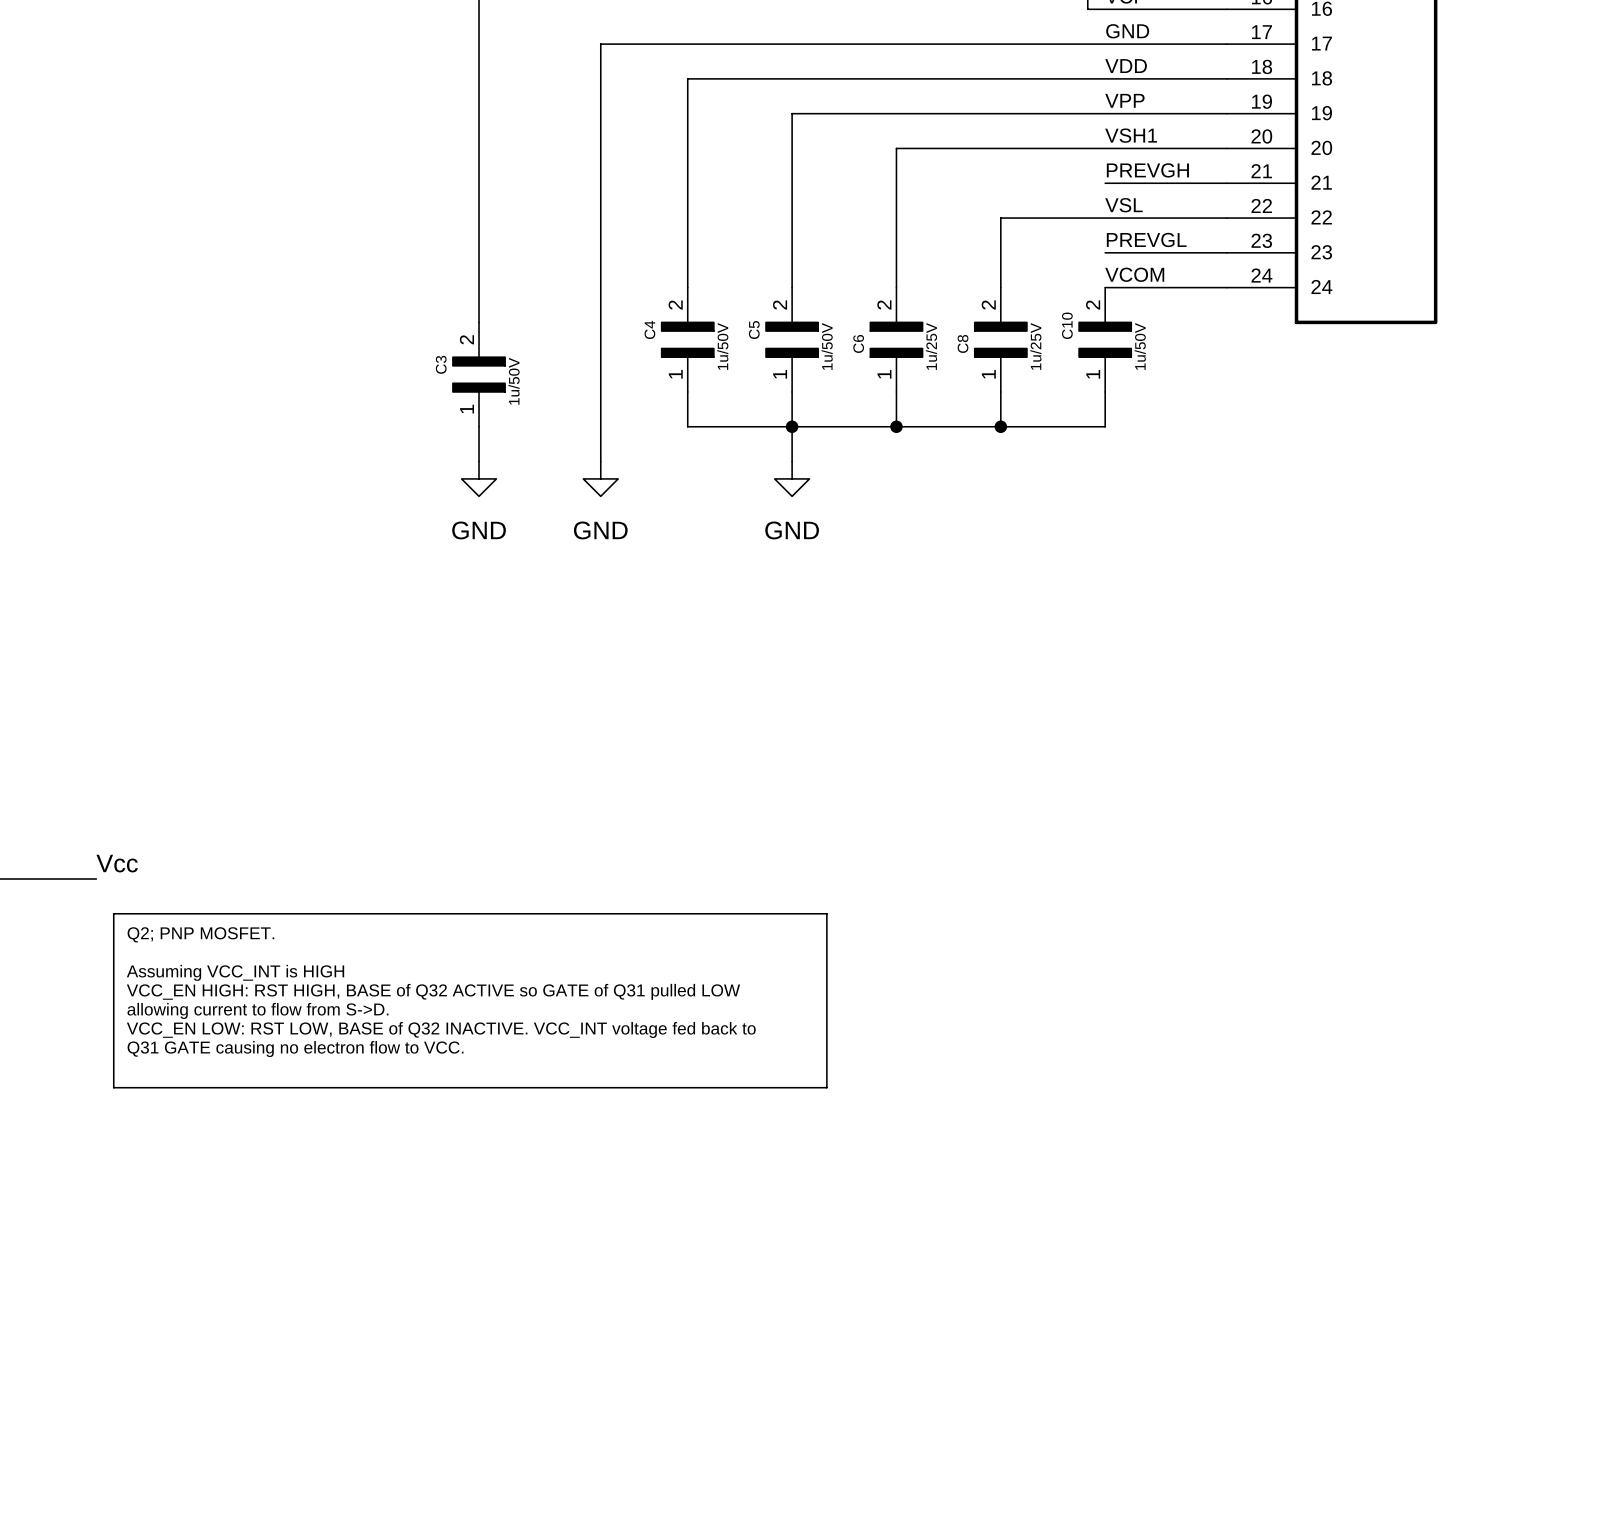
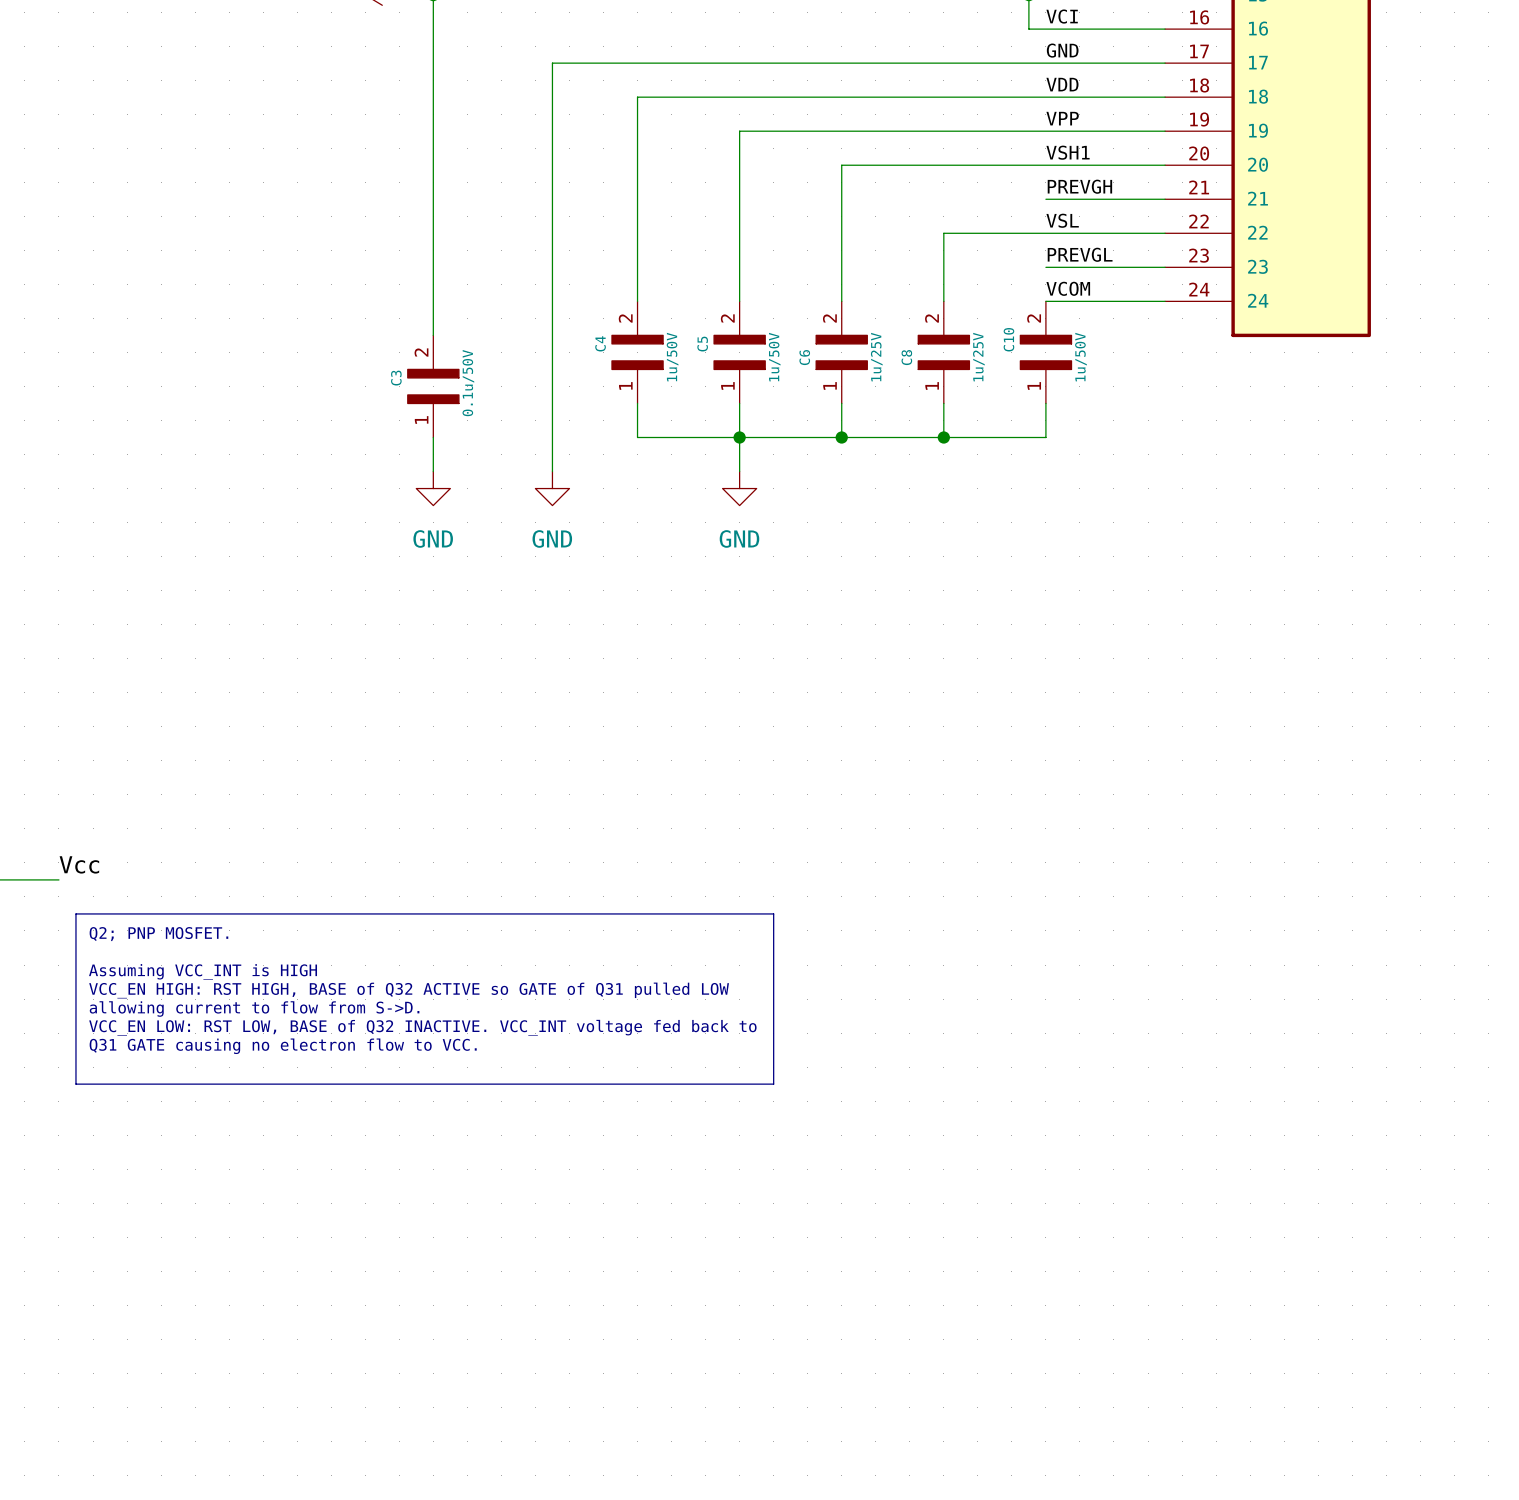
C3 value: 1u/50V (514, 381) -> 0.1u/50V (468, 383)

